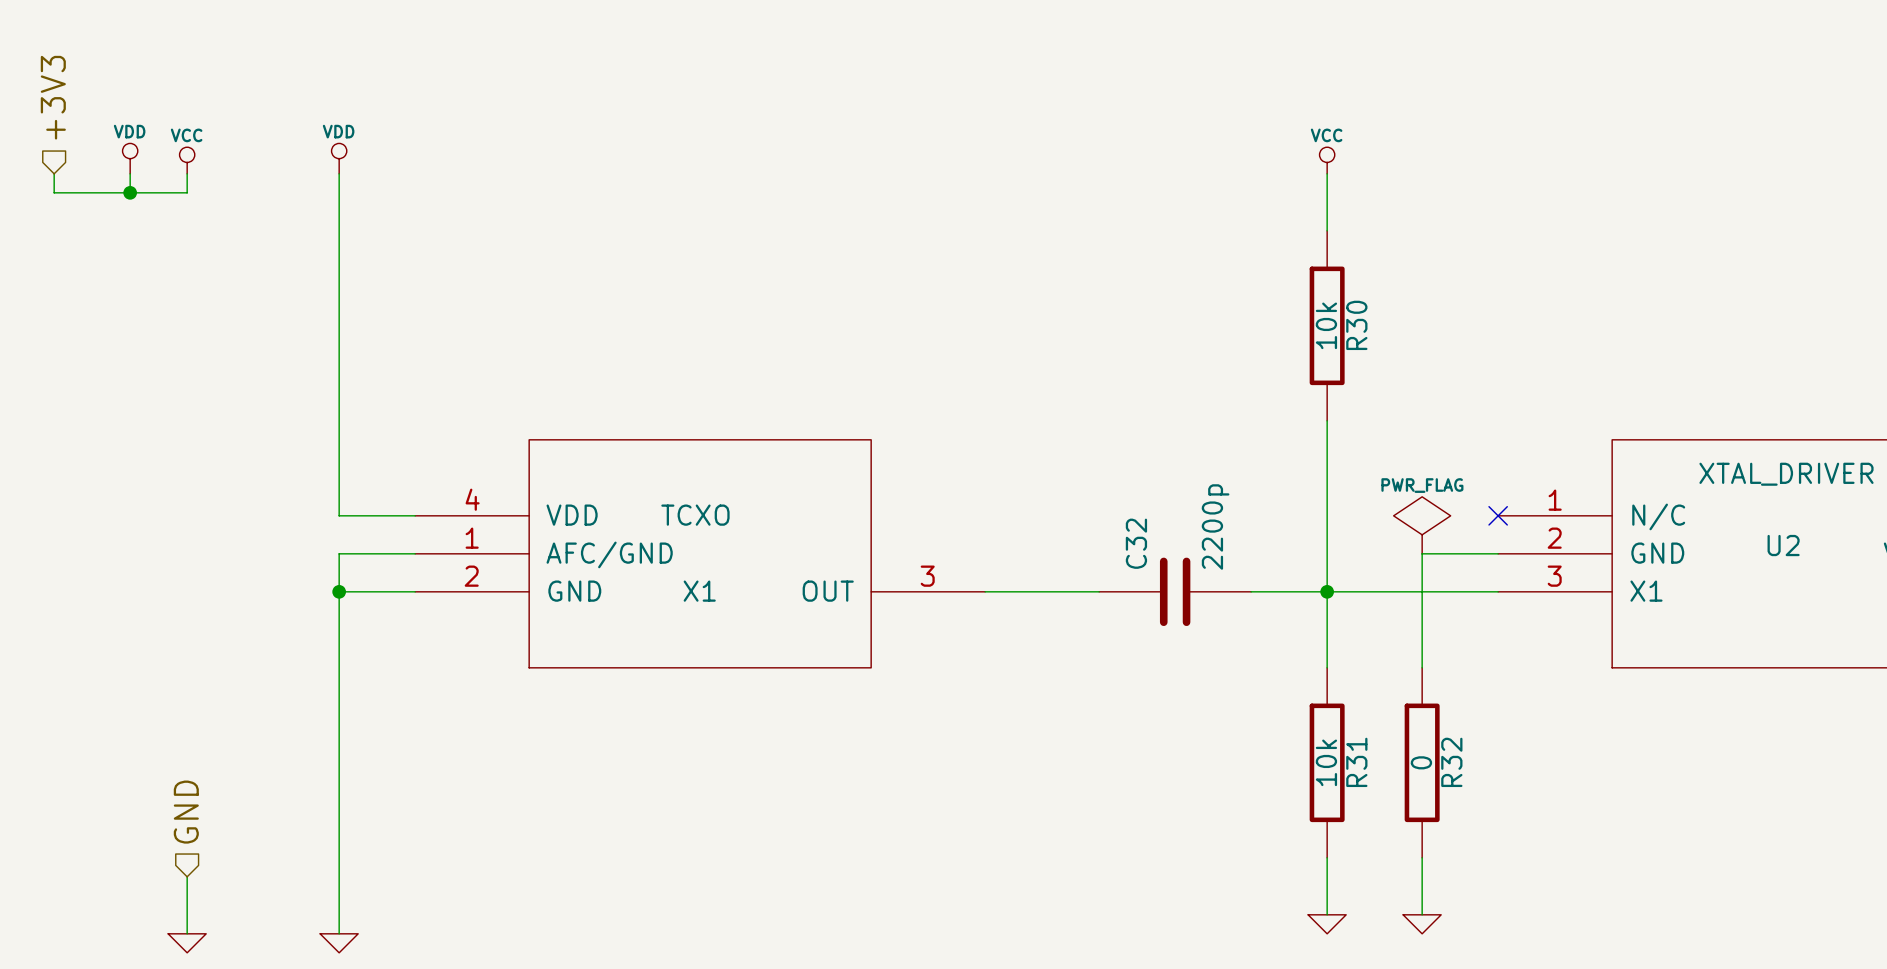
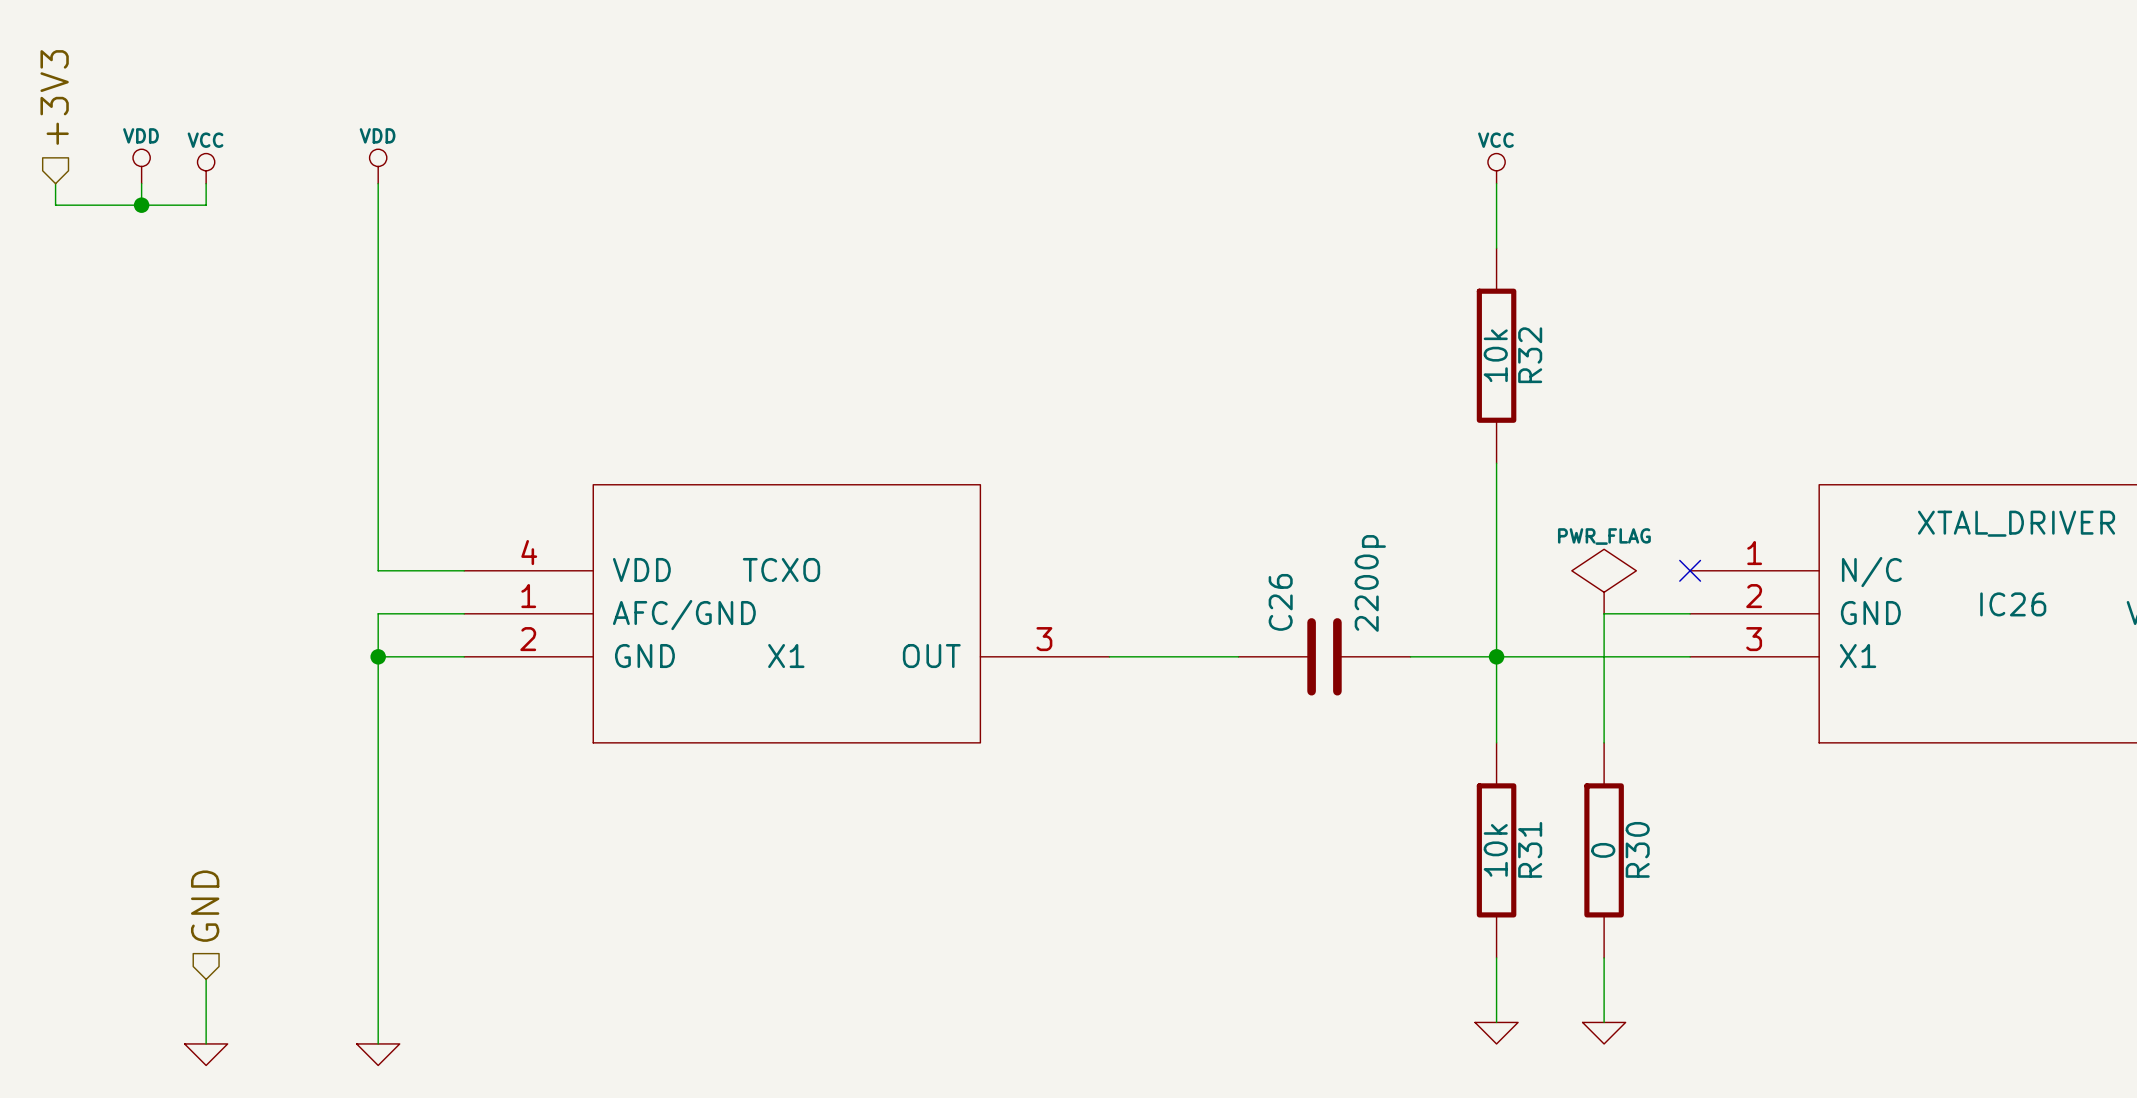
R30 name: R30 (1356, 325) -> R32 (1530, 355)
C32 name: C32 (1136, 543) -> C26 (1280, 602)
U2 name: U2 (1783, 545) -> IC26 (2013, 604)
R32 name: R32 (1451, 762) -> R30 (1637, 849)

